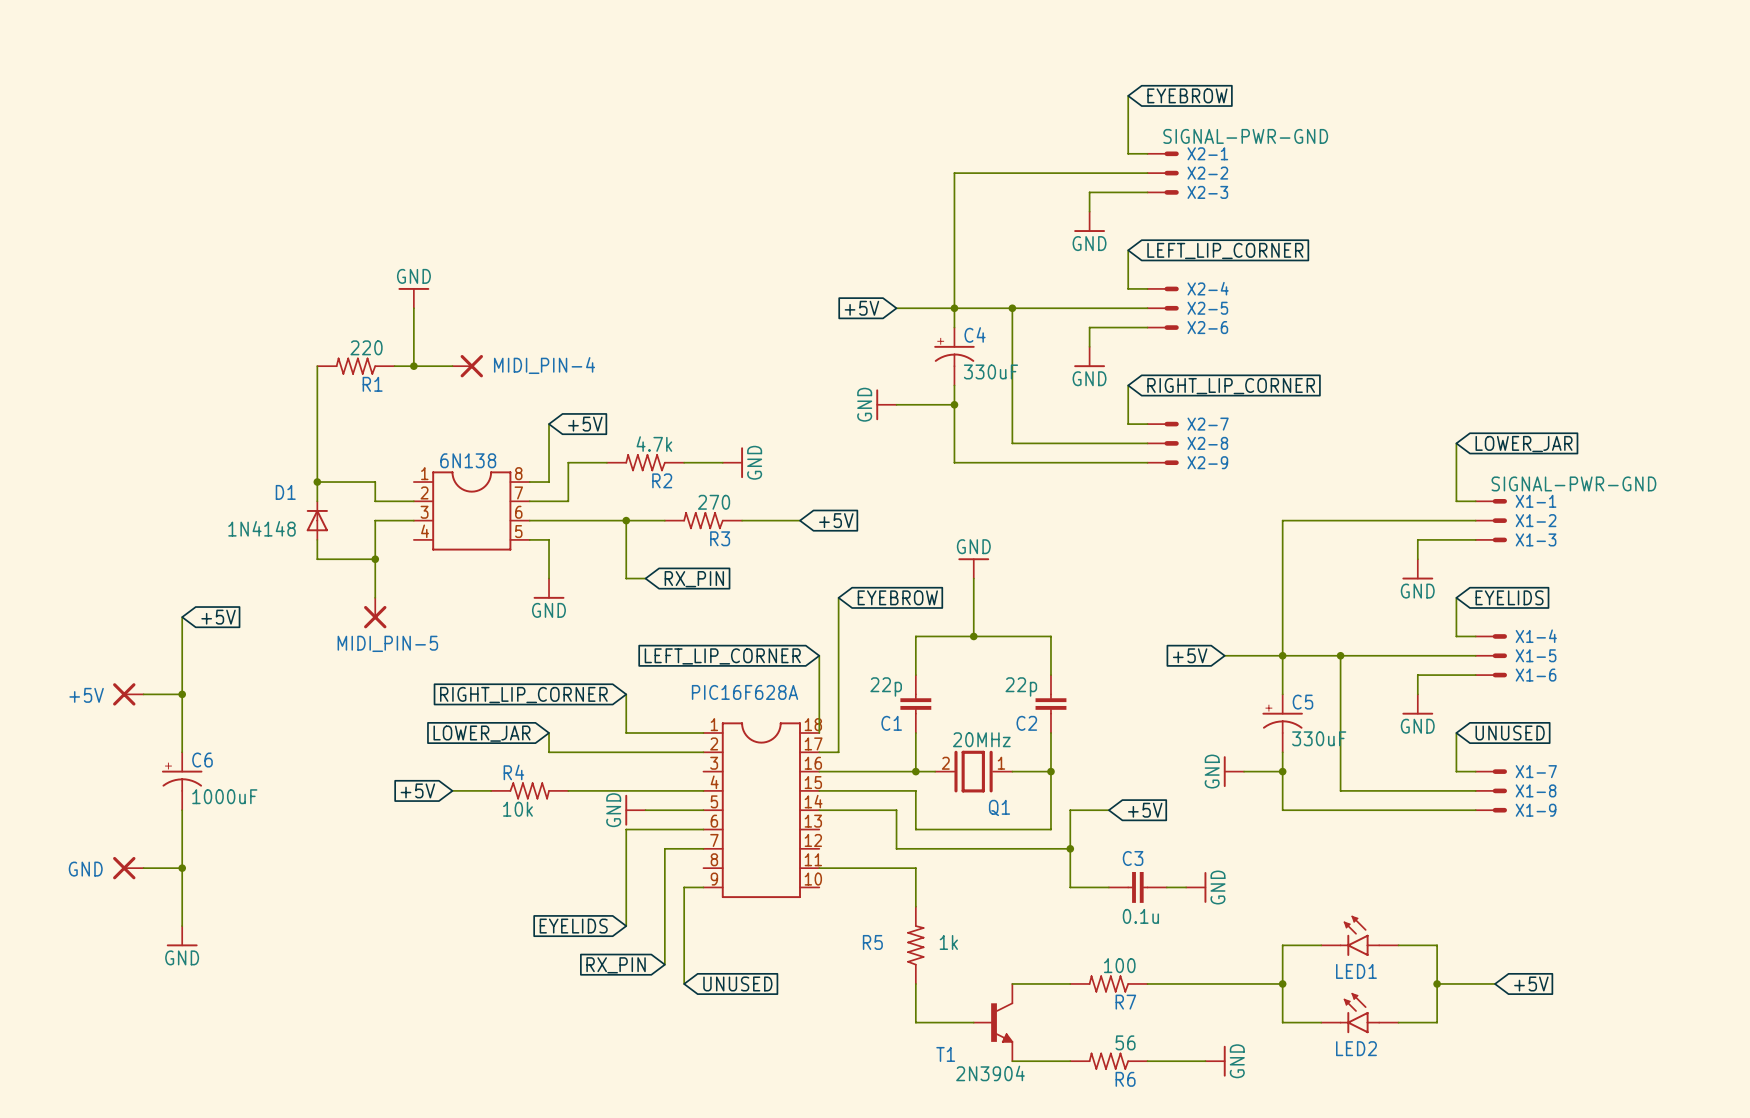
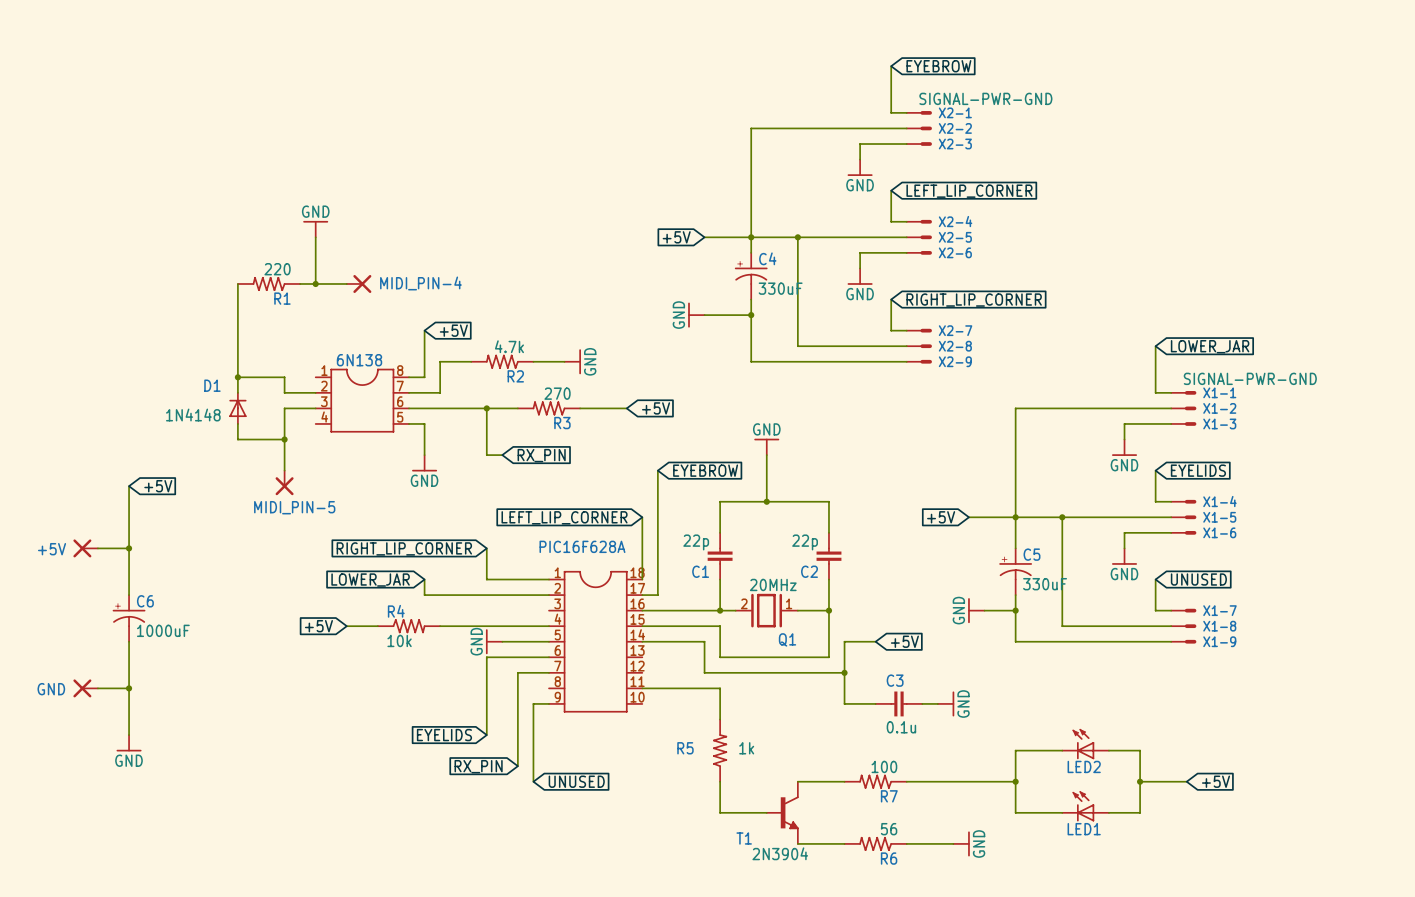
LED1 symbol: [1321, 915, 1399, 956] -> [1062, 791, 1109, 822]
LED2 symbol: [1321, 993, 1399, 1034] -> [1062, 729, 1109, 760]

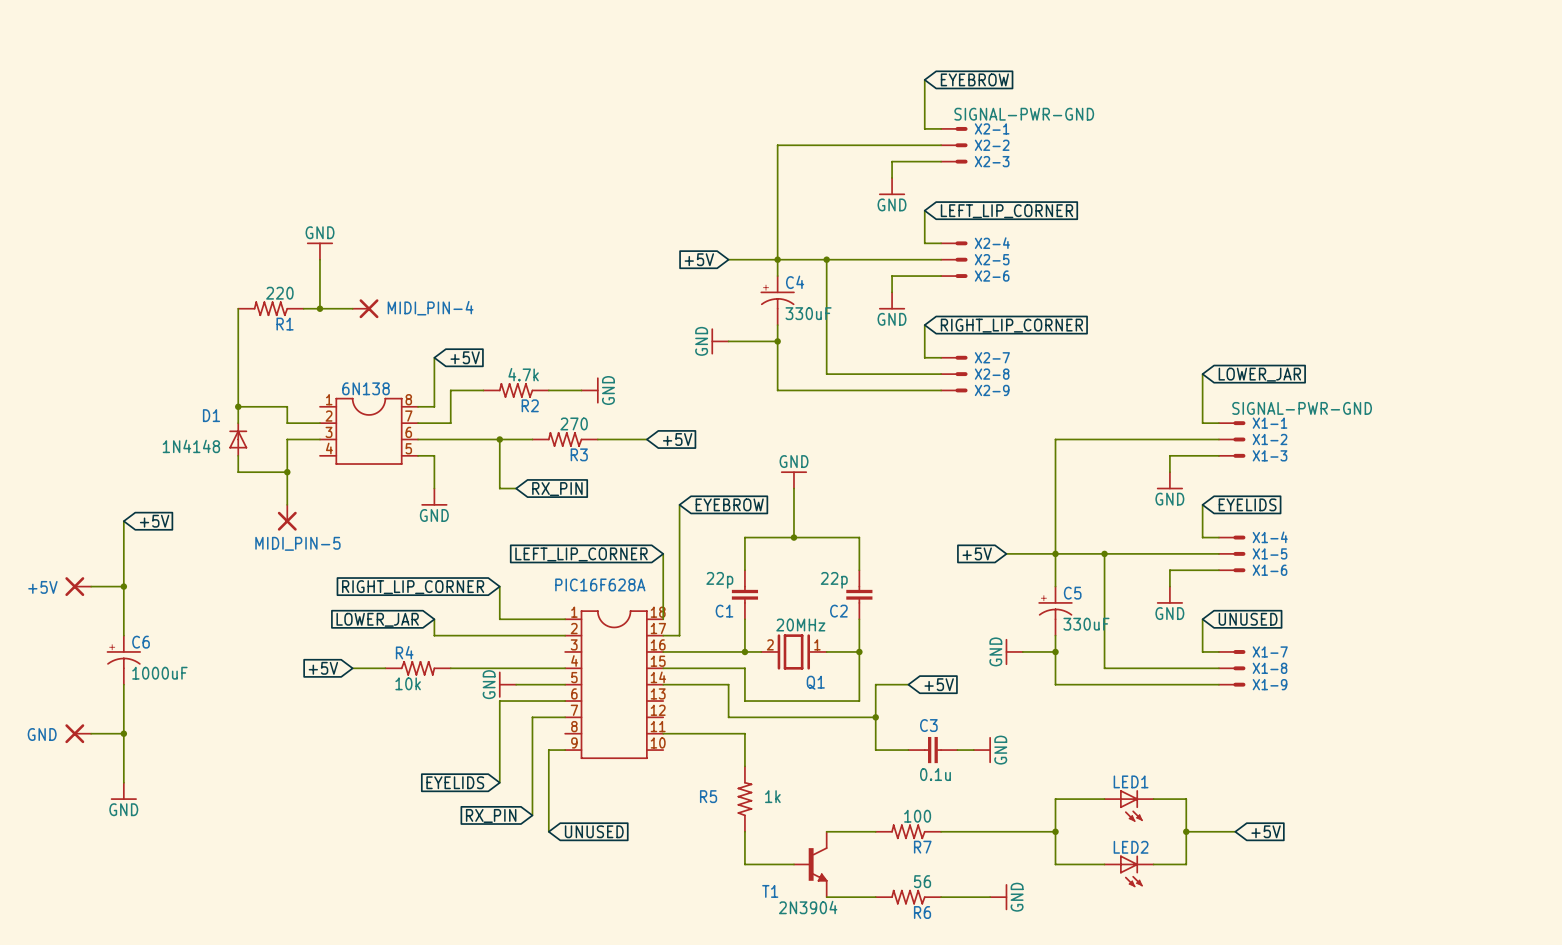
LED2 rotation: 0° (1083, 744) -> 180° (1131, 871)
LED2 position: (1085, 744) -> (1129, 871)
LED1 rotation: 0° (1083, 806) -> 180° (1131, 805)
LED1 position: (1085, 806) -> (1129, 805)

